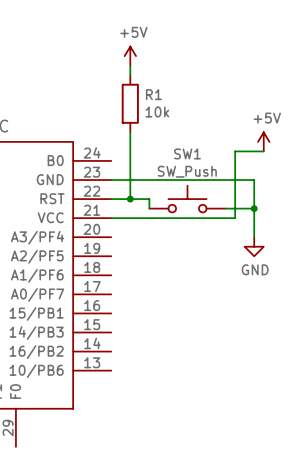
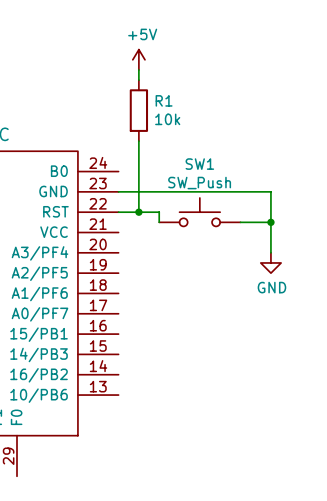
power symbol: +5V (263, 141) -> none
wire: (263, 151) (235, 151) (235, 218) (111, 218) -> none

